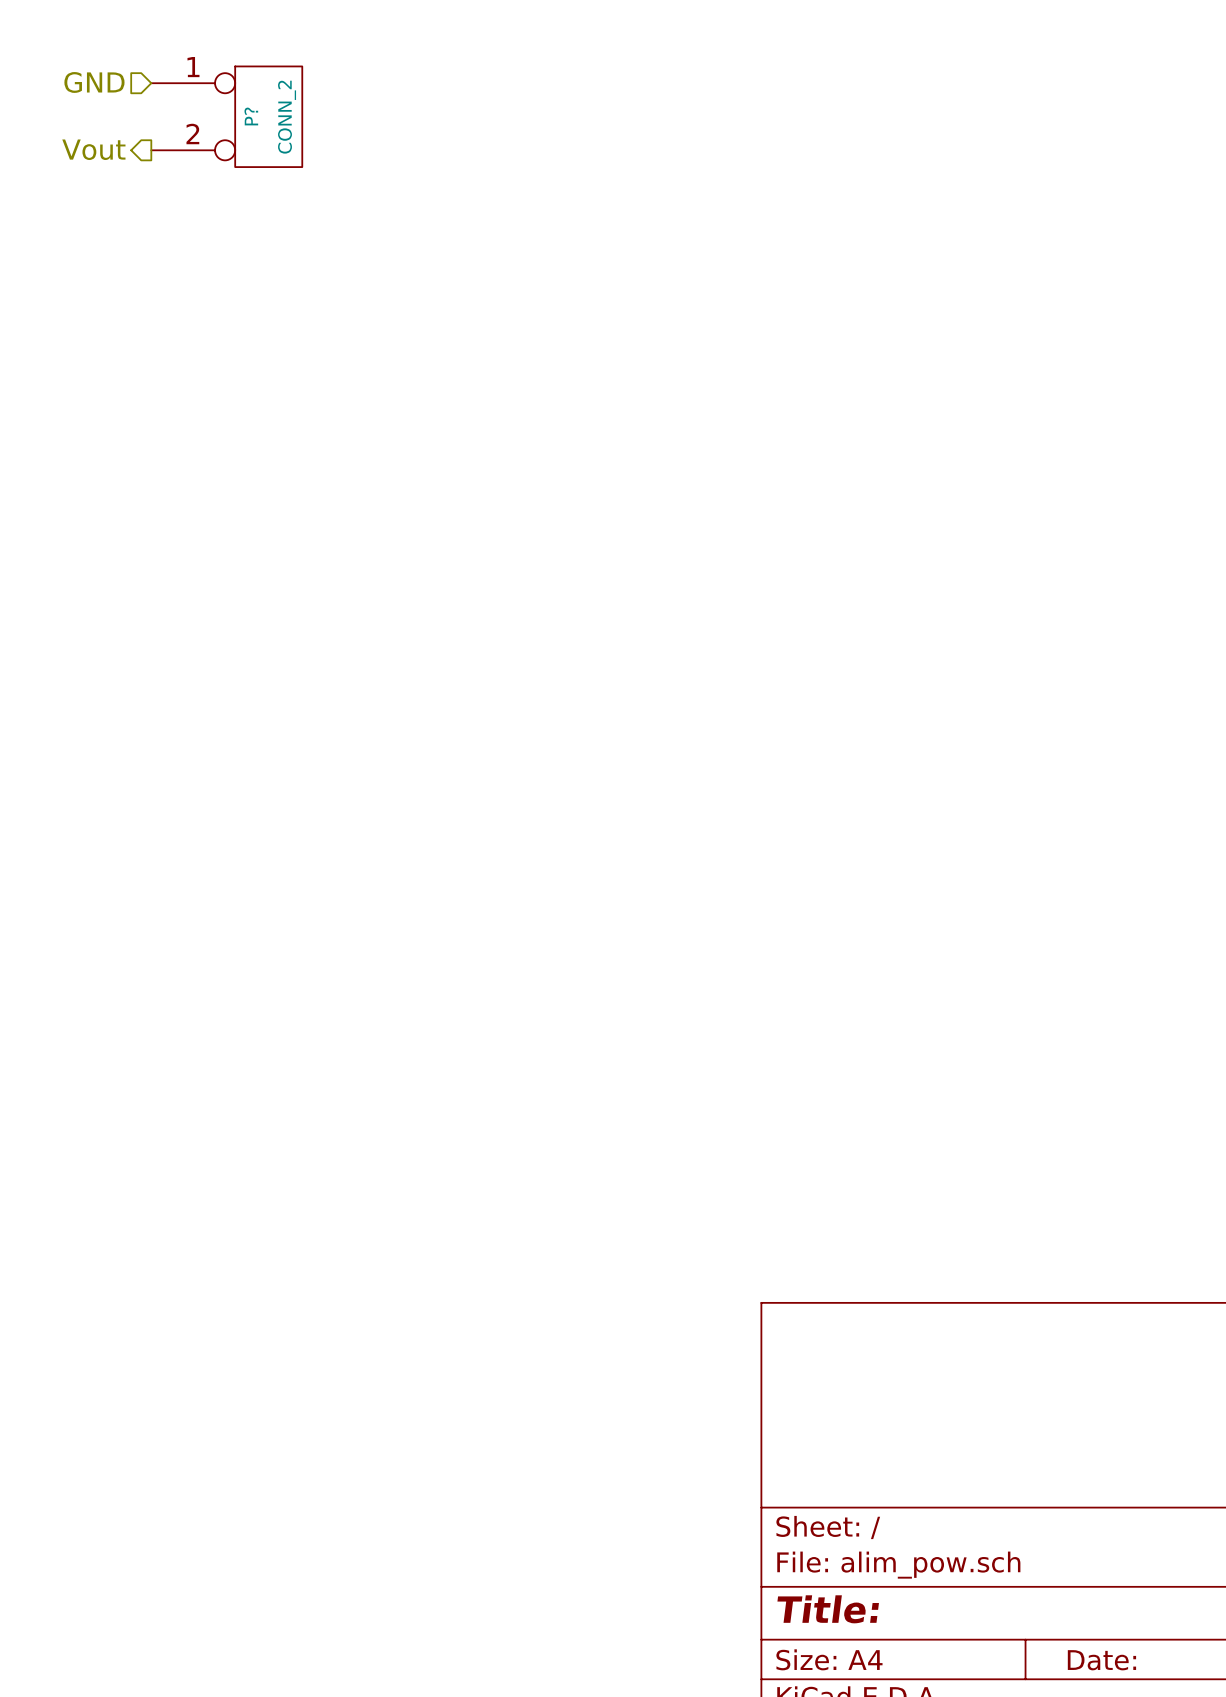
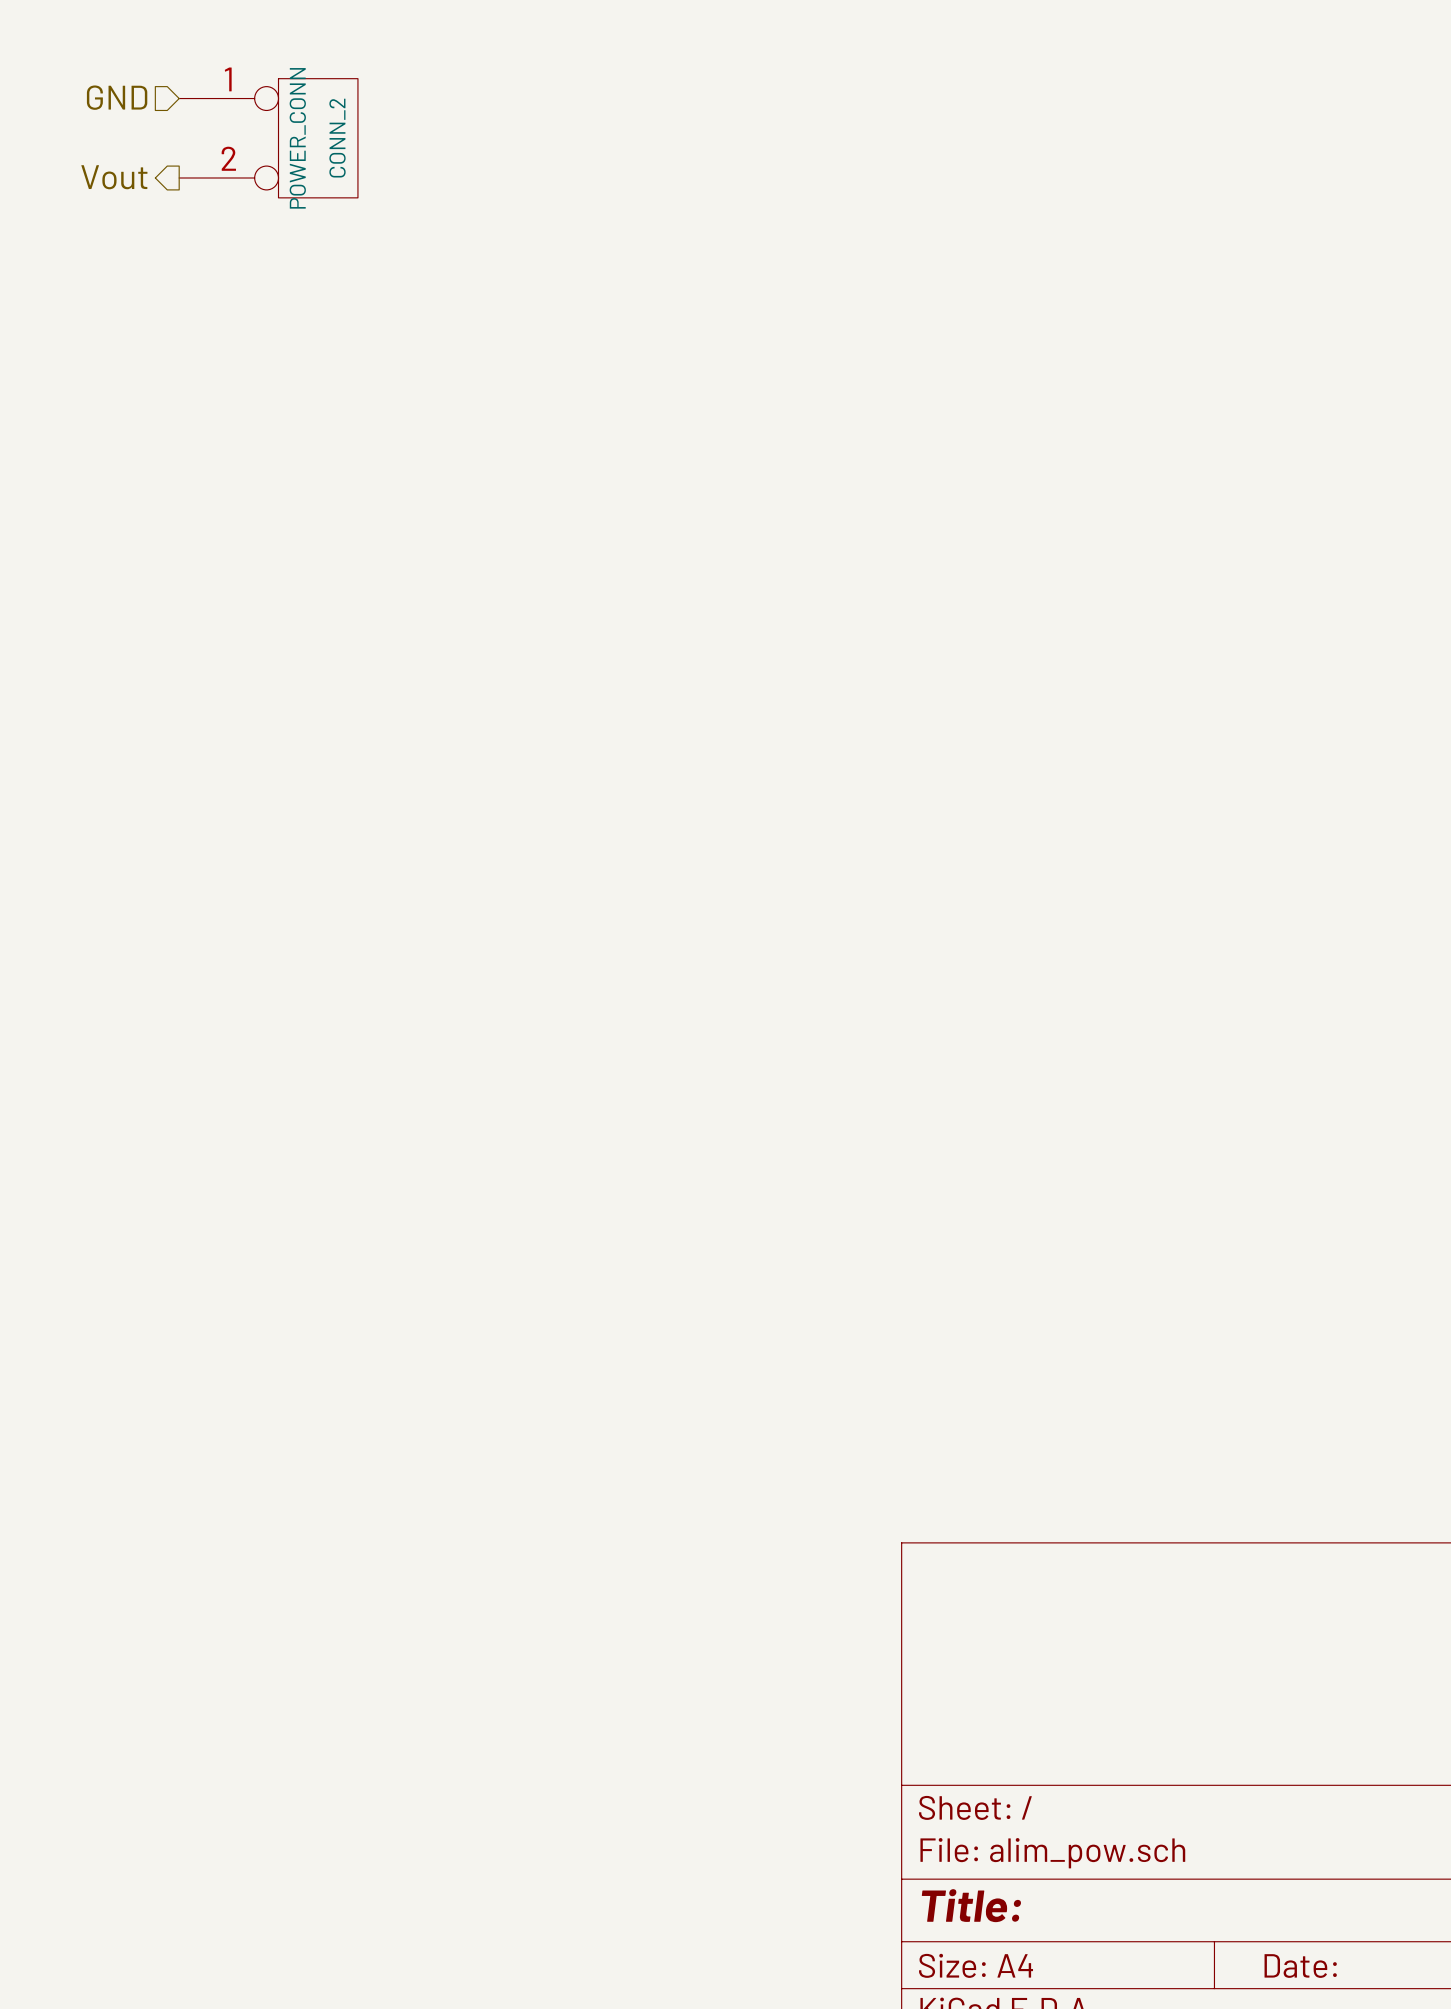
P? name: P? (251, 116) -> POWER_CONN (297, 138)

